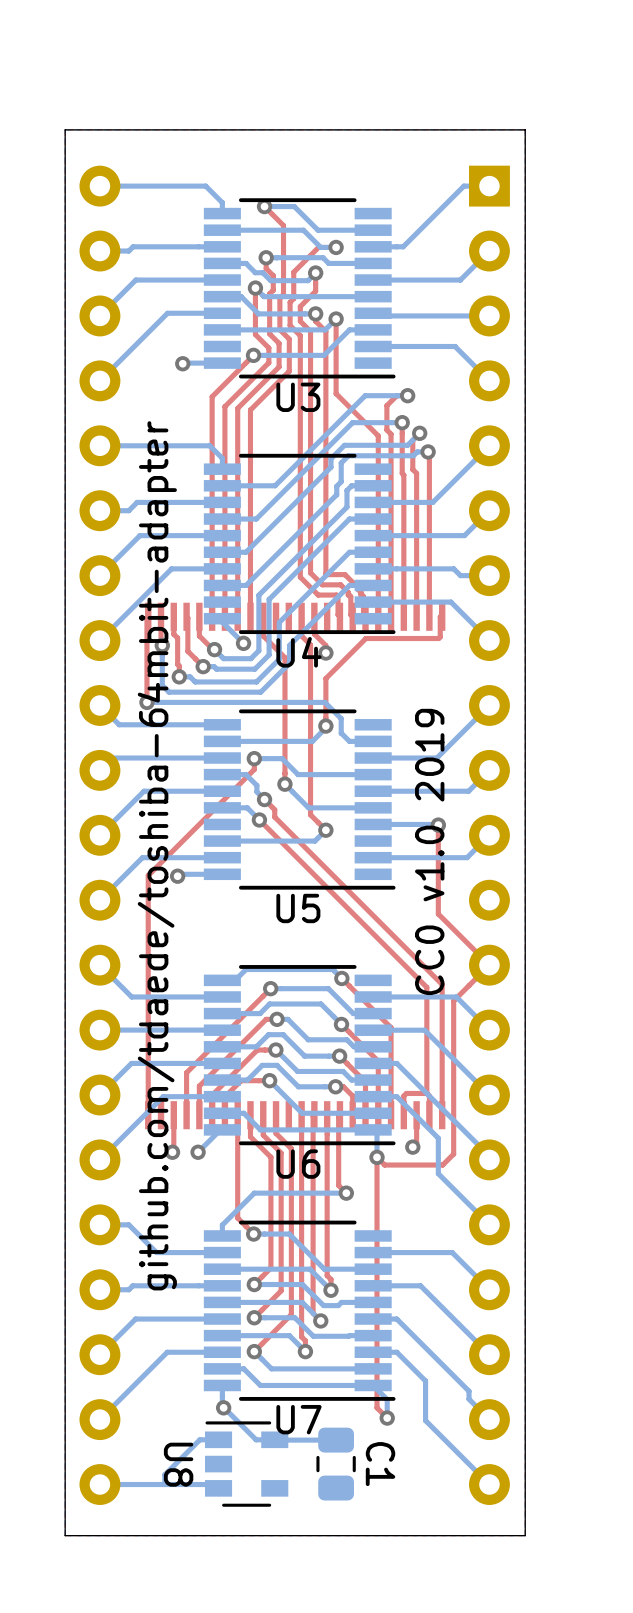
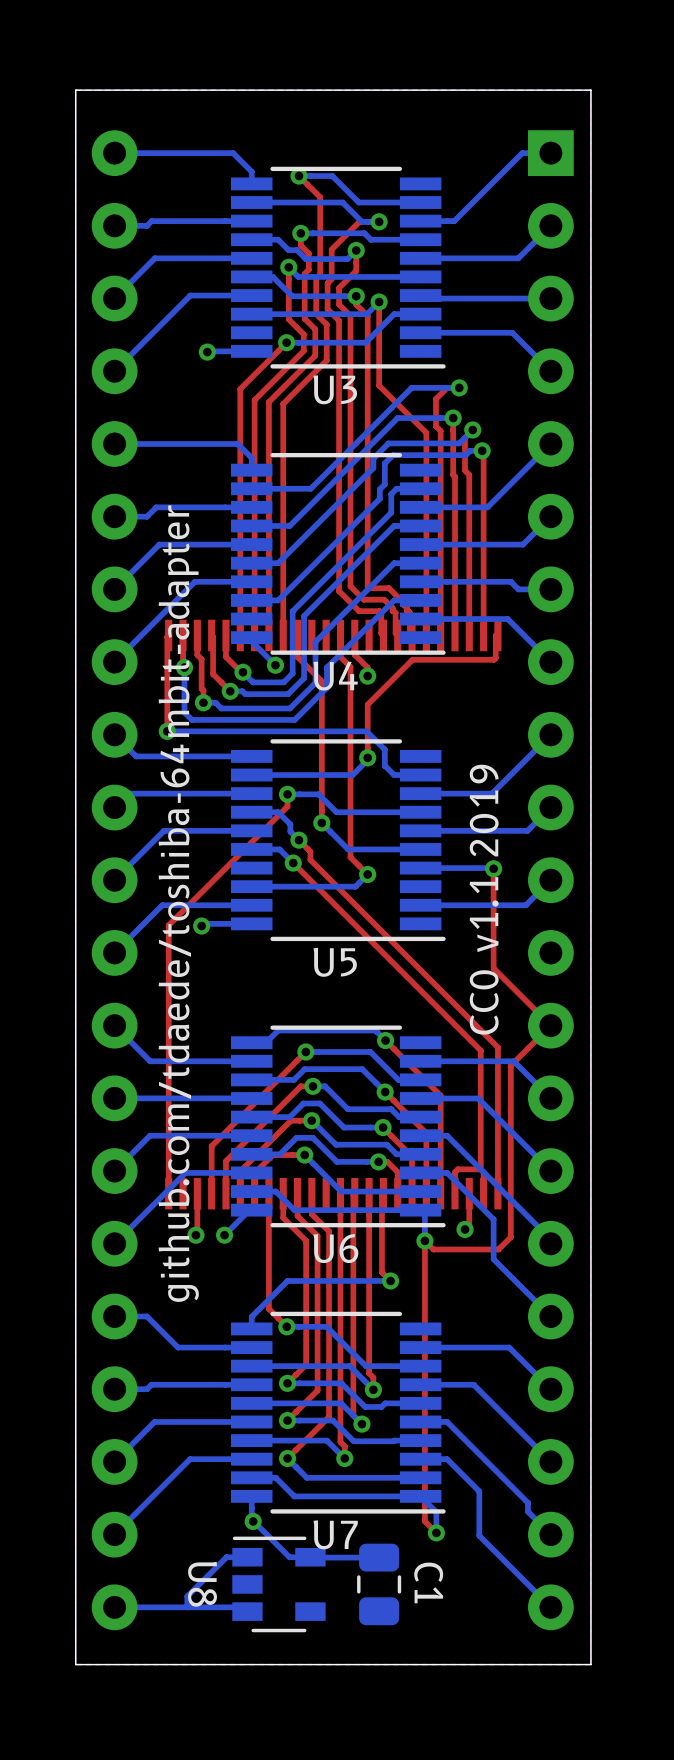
text: CC0 v1.0 2019 (429, 851) -> CC0 v1.1 2019 (484, 899)

